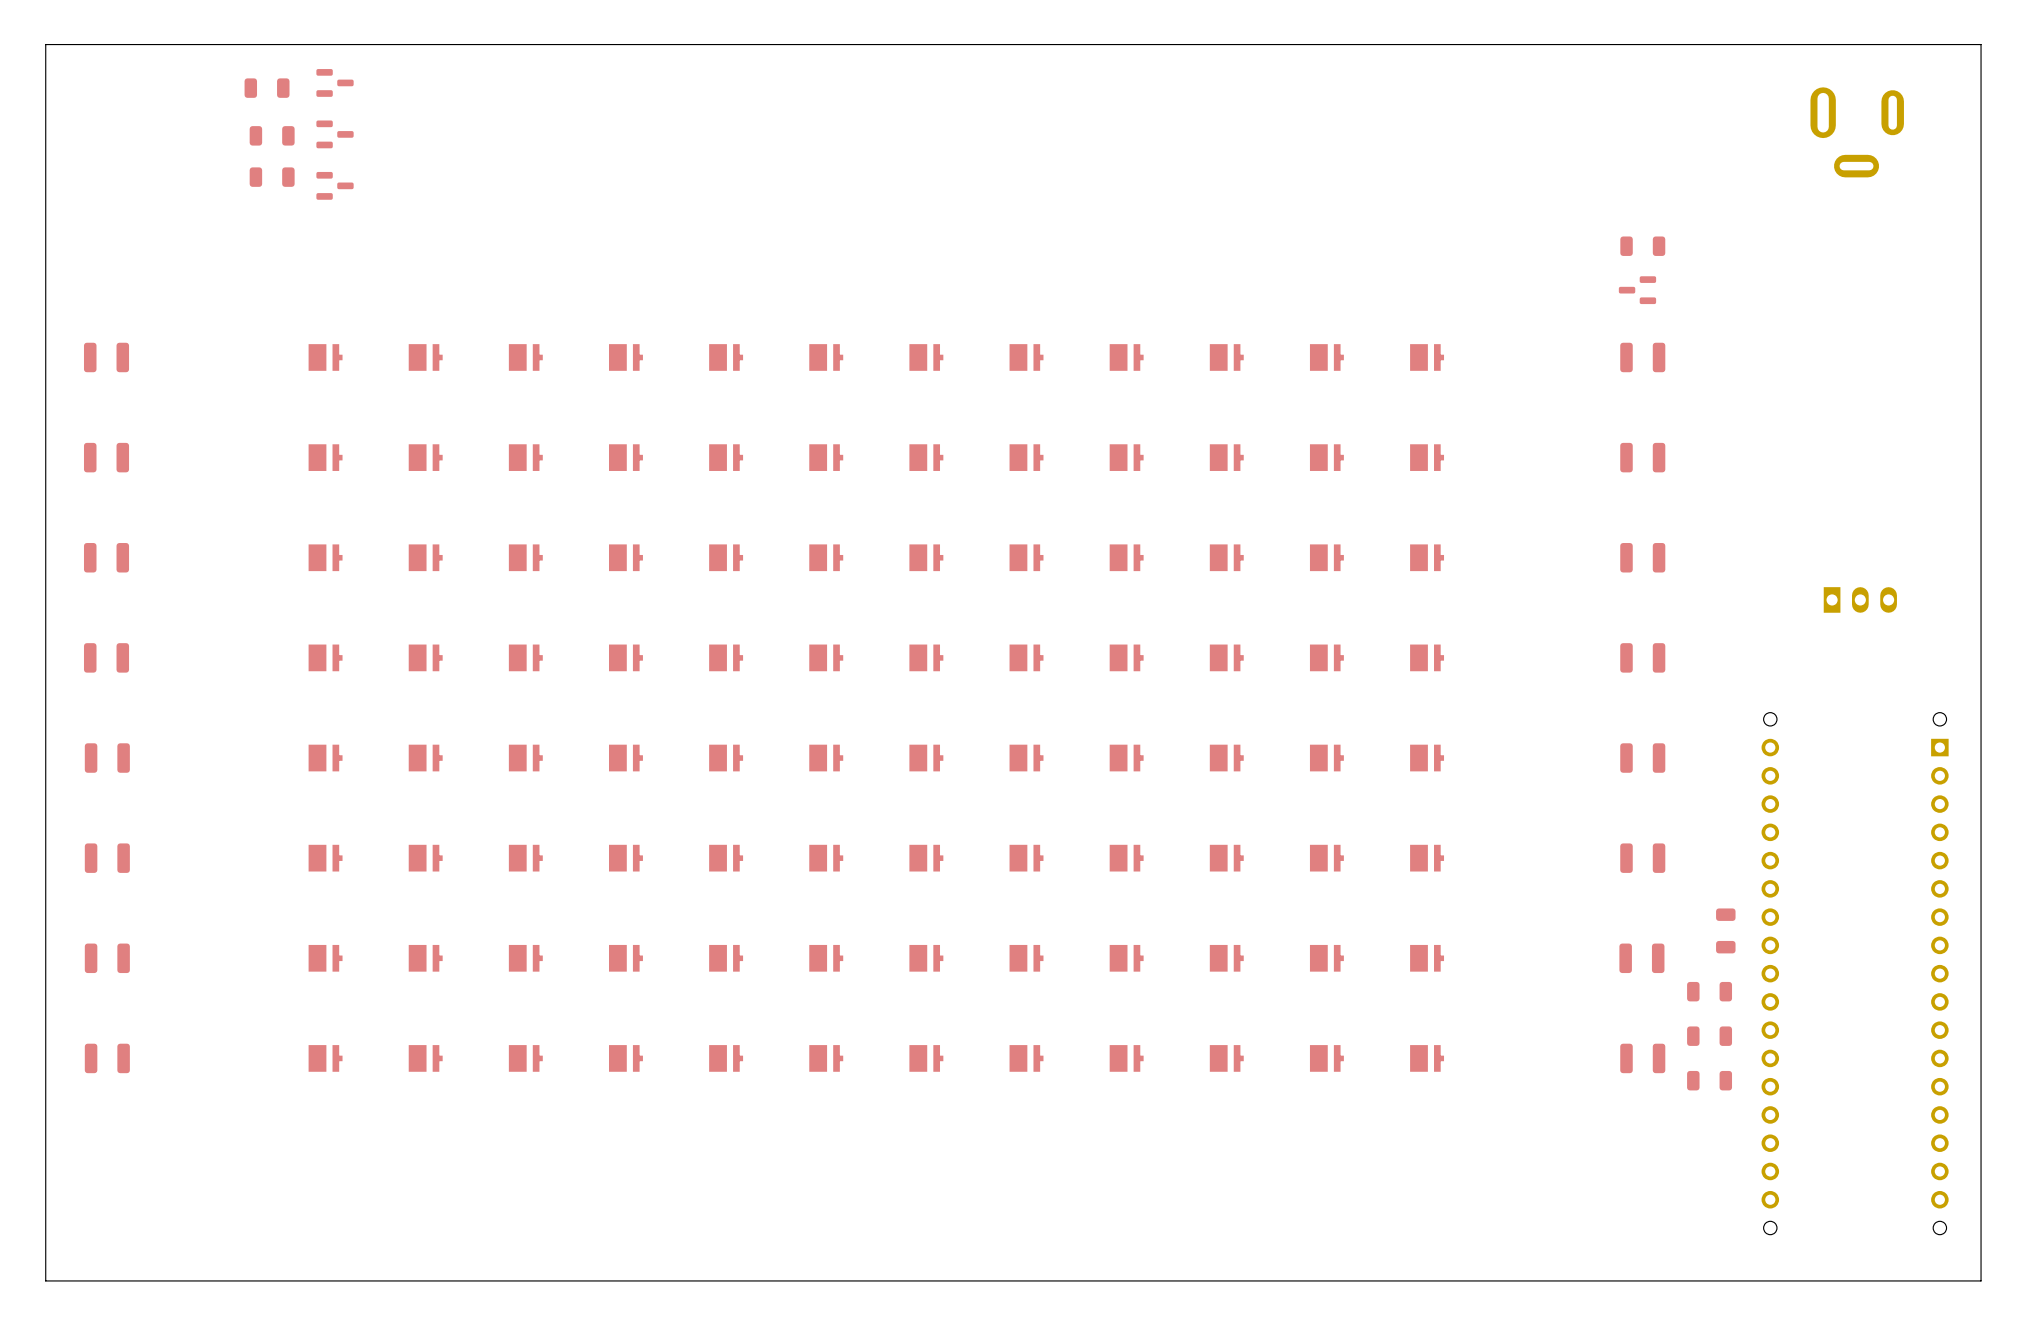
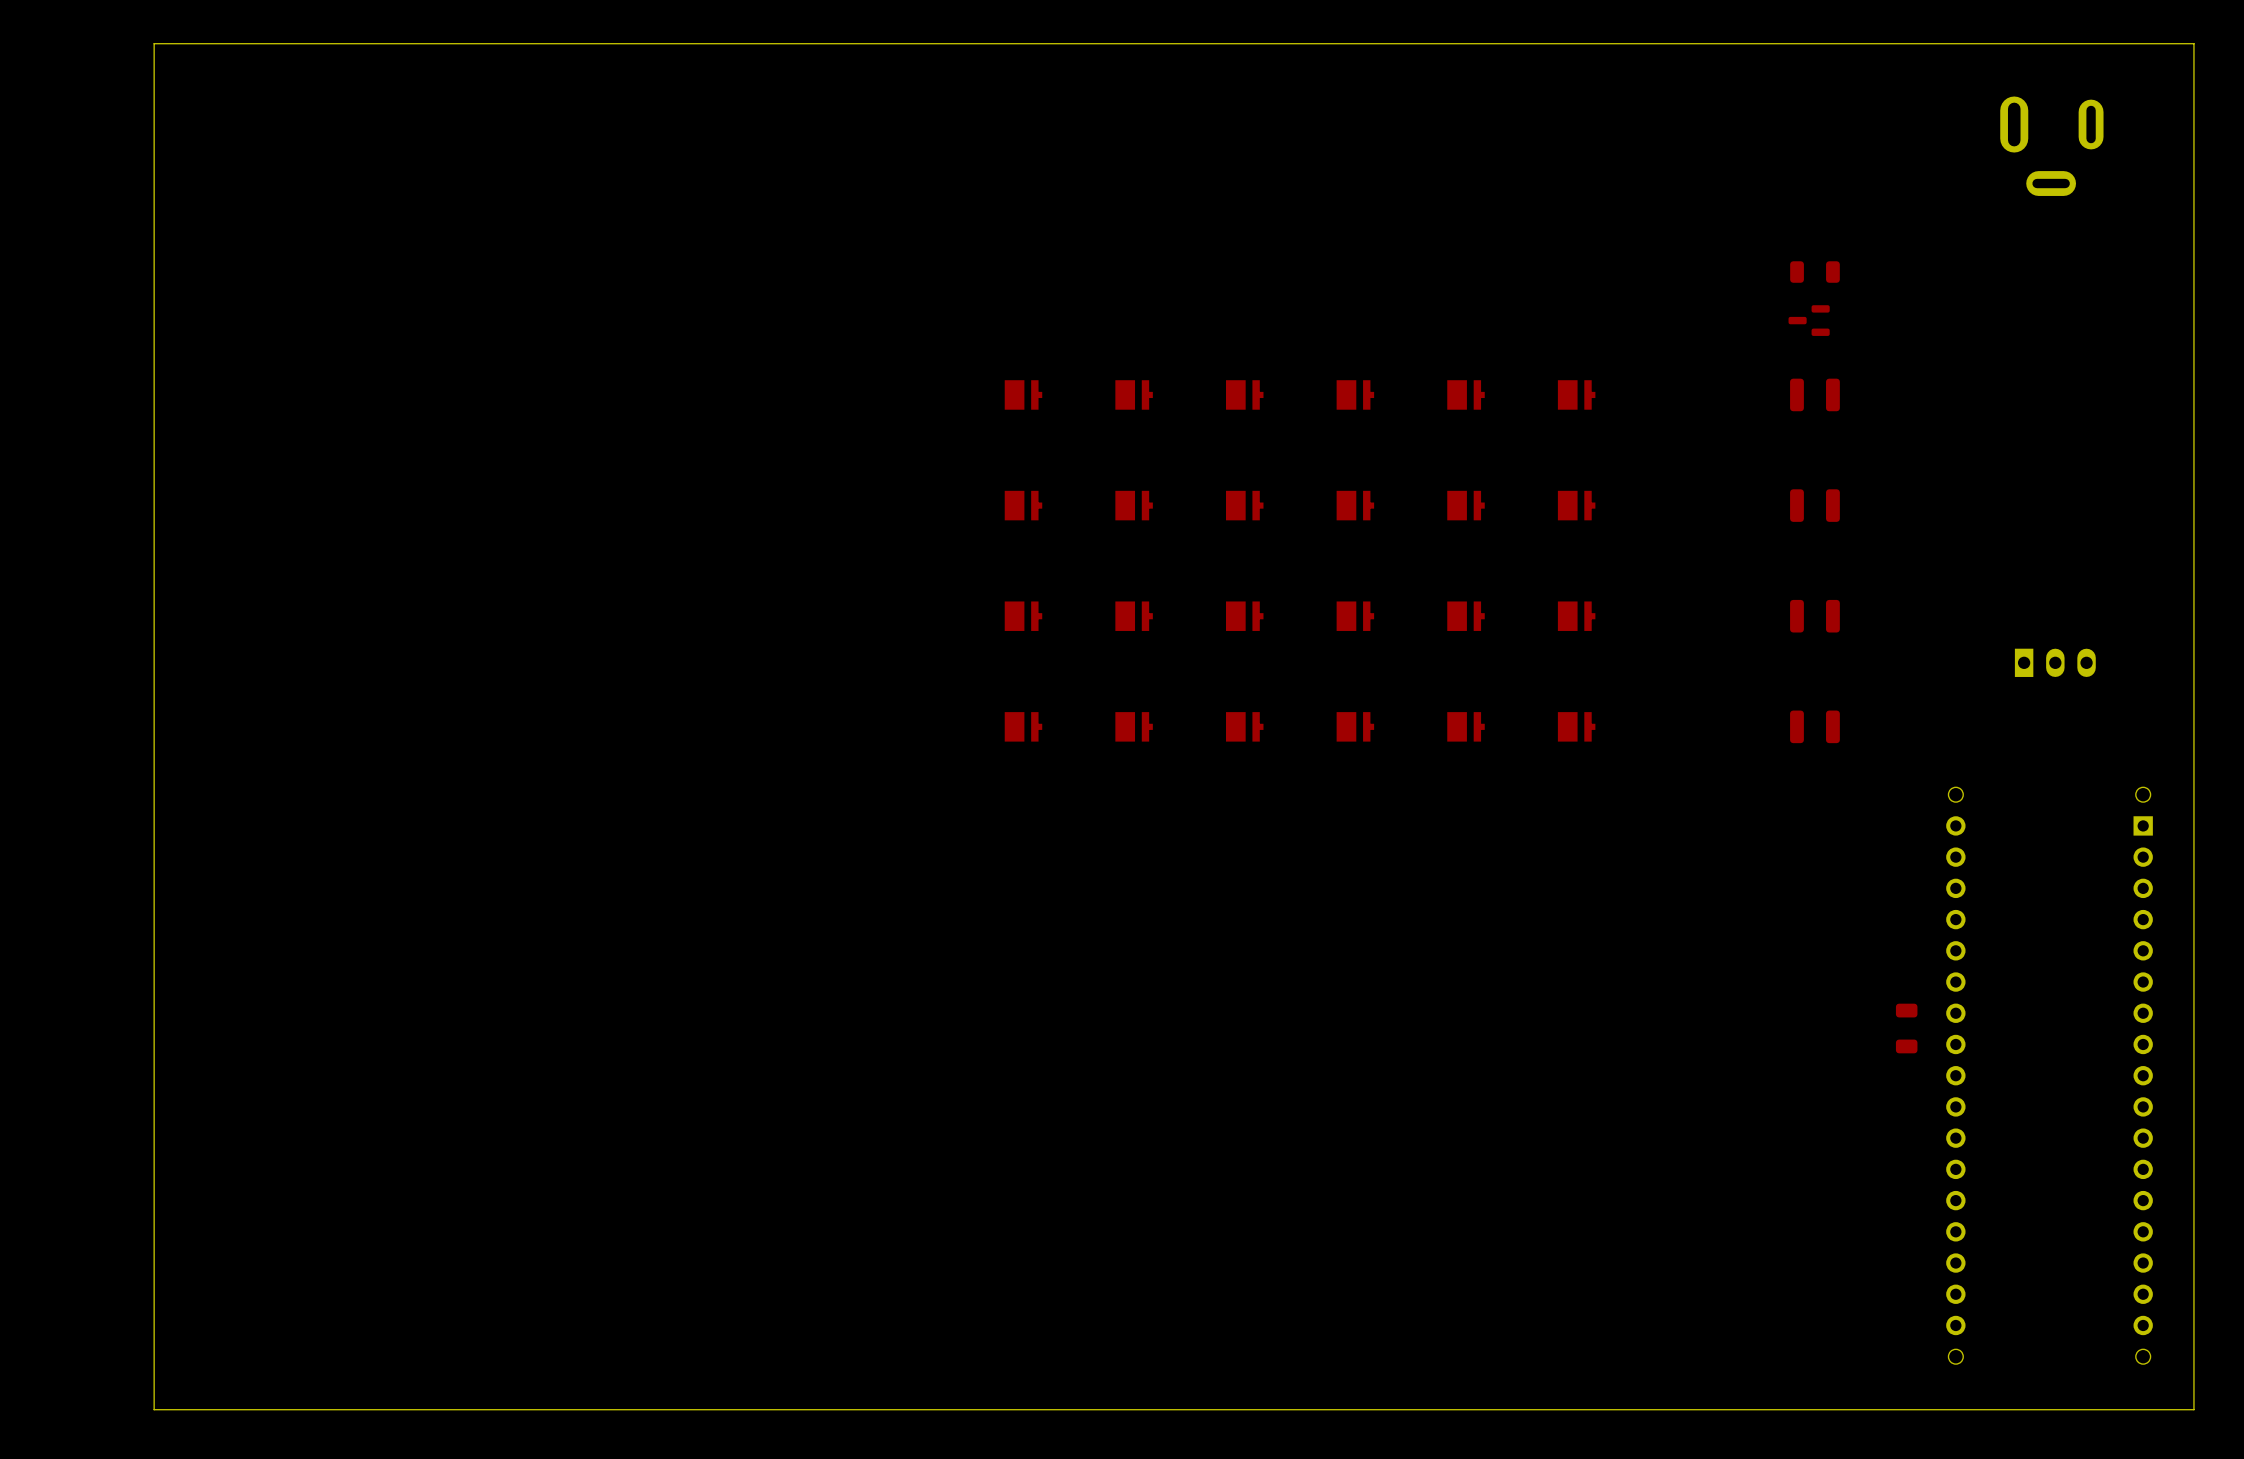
board edge: (1981, 44) (45, 44) (45, 1280) (1981, 1280) (1981, 44) -> (2193, 43) (2193, 1409) (154, 1409) (154, 43) (2193, 43)
part: (335, 82) -> none
part: (267, 88) -> none
part: (335, 134) -> none
part: (272, 135) -> none
part: (272, 177) -> none
part: (335, 185) -> none
part: (106, 357) -> none
part: (325, 357) -> none
part: (425, 357) -> none
part: (525, 357) -> none
part: (625, 357) -> none
part: (726, 357) -> none
part: (826, 357) -> none
part: (106, 457) -> none
part: (325, 457) -> none
part: (425, 457) -> none
part: (525, 457) -> none
part: (625, 457) -> none
part: (726, 457) -> none
part: (826, 457) -> none
part: (106, 557) -> none
part: (325, 557) -> none
part: (425, 557) -> none
part: (525, 557) -> none
part: (625, 557) -> none
part: (726, 557) -> none
part: (826, 557) -> none
part: (106, 657) -> none
part: (325, 657) -> none
part: (425, 657) -> none
part: (525, 657) -> none
part: (625, 657) -> none
part: (726, 657) -> none
part: (826, 657) -> none
part: (107, 758) -> none
part: (325, 758) -> none
part: (425, 758) -> none
part: (525, 758) -> none
part: (625, 758) -> none
part: (726, 758) -> none
part: (826, 758) -> none
part: (926, 758) -> none
part: (1026, 758) -> none
part: (1126, 758) -> none
part: (1226, 758) -> none
part: (1326, 758) -> none
part: (1427, 758) -> none
part: (1642, 758) -> none
part: (107, 858) -> none
part: (325, 858) -> none
part: (425, 858) -> none
part: (525, 858) -> none
part: (625, 858) -> none
part: (726, 858) -> none
part: (826, 858) -> none
part: (926, 858) -> none
part: (1026, 858) -> none
part: (1126, 858) -> none
part: (1226, 858) -> none
part: (1326, 858) -> none
part: (1427, 858) -> none
part: (1642, 858) -> none
part: (107, 958) -> none
part: (325, 958) -> none
part: (425, 958) -> none
part: (525, 958) -> none
part: (625, 958) -> none
part: (726, 958) -> none
part: (826, 958) -> none
part: (926, 958) -> none
part: (1026, 958) -> none
part: (1126, 958) -> none
part: (1226, 958) -> none
part: (1326, 958) -> none
part: (1427, 958) -> none
part: (1641, 958) -> none
part: (1709, 991) -> none
part: (1709, 1036) -> none
part: (107, 1058) -> none
part: (325, 1058) -> none
part: (425, 1058) -> none
part: (525, 1058) -> none
part: (625, 1058) -> none
part: (726, 1058) -> none
part: (826, 1058) -> none
part: (926, 1058) -> none
part: (1026, 1058) -> none
part: (1126, 1058) -> none
part: (1226, 1058) -> none
part: (1326, 1058) -> none
part: (1427, 1058) -> none
part: (1642, 1058) -> none
part: (1709, 1080) -> none

